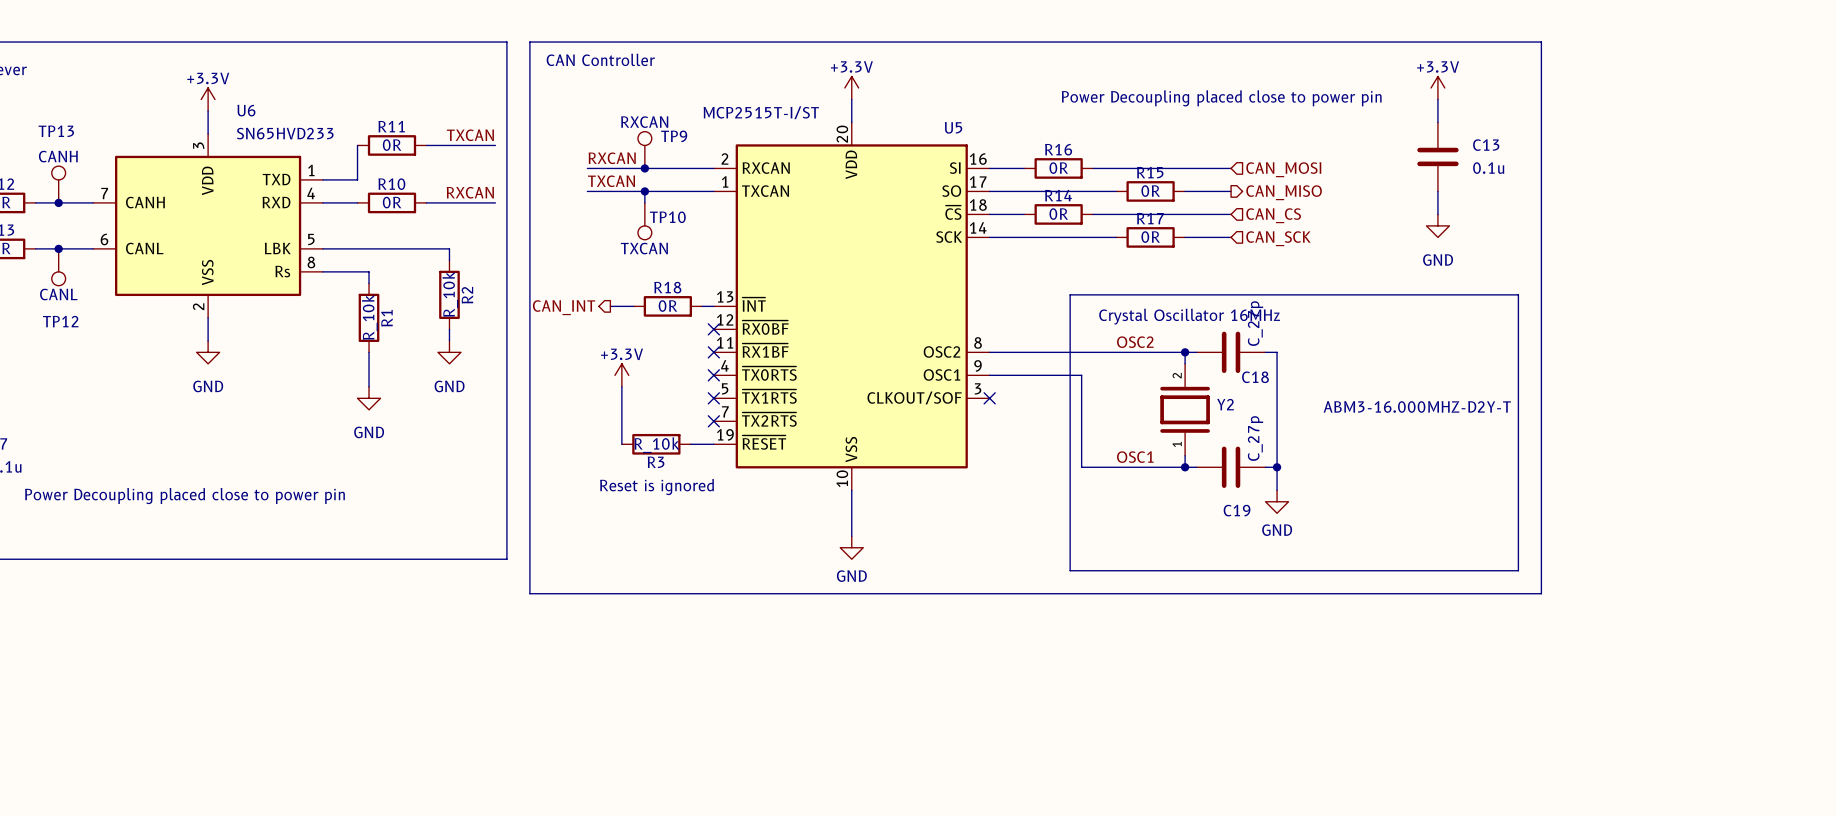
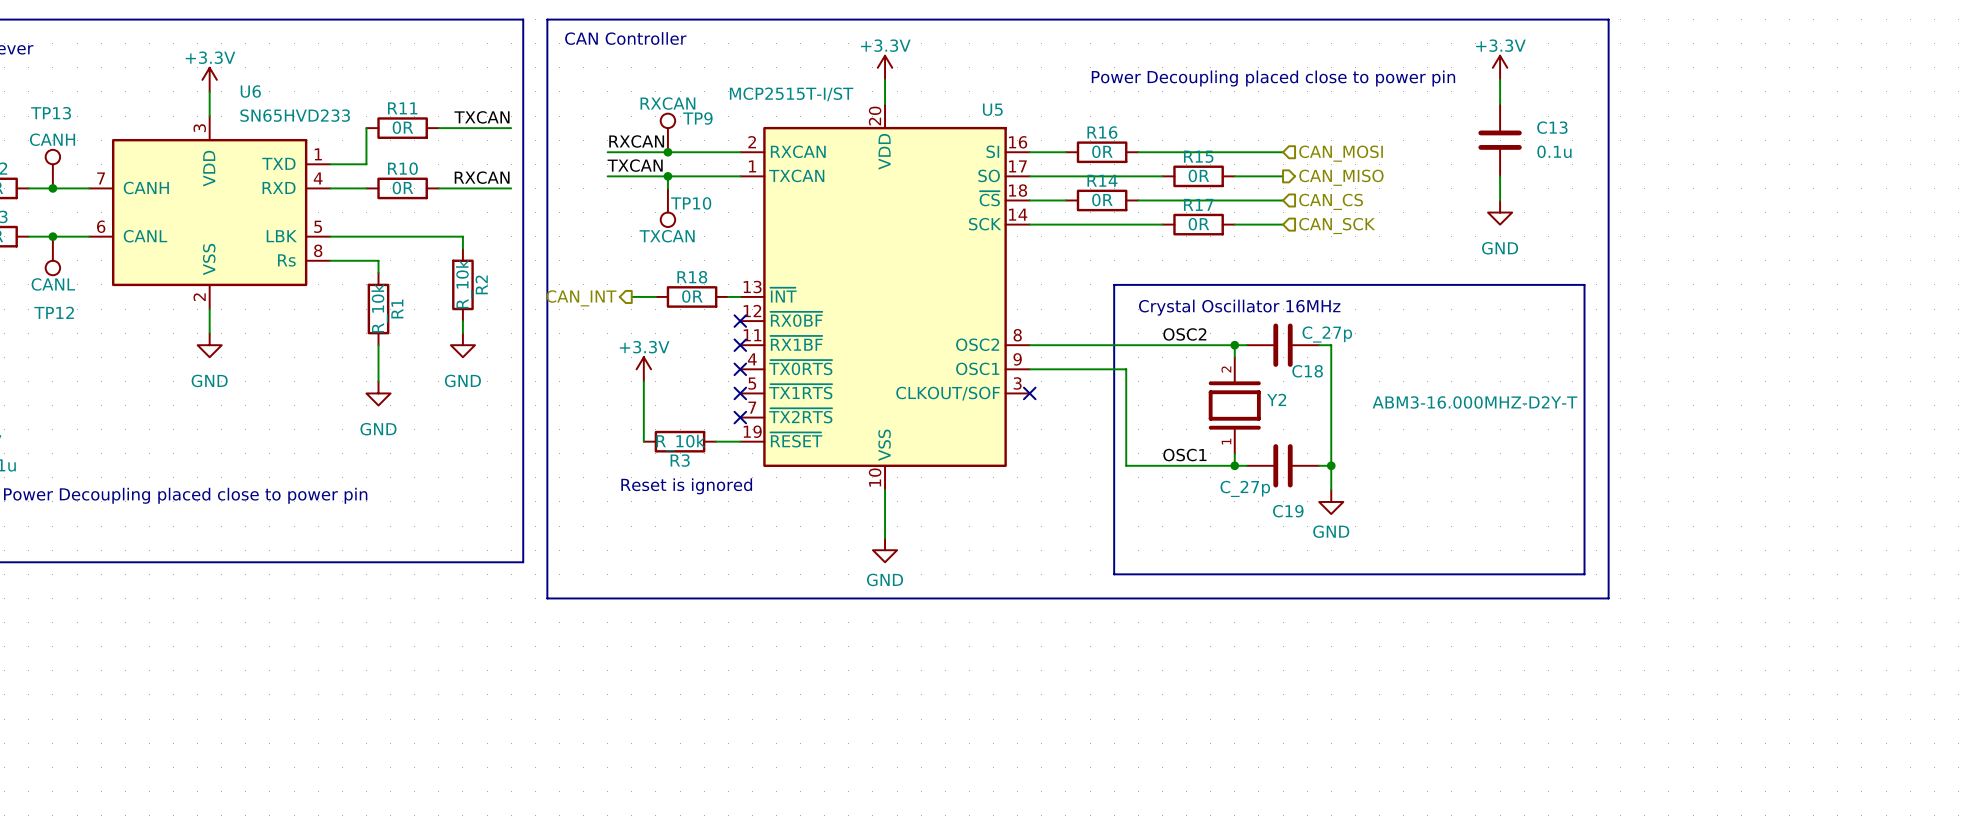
C18 value rotation: 0° (1255, 323) -> 90° clockwise (1327, 334)
C19 value rotation: 0° (1255, 438) -> 90° clockwise (1245, 488)
C19 value position: C_27p (1255, 438) -> C_27p (1245, 488)

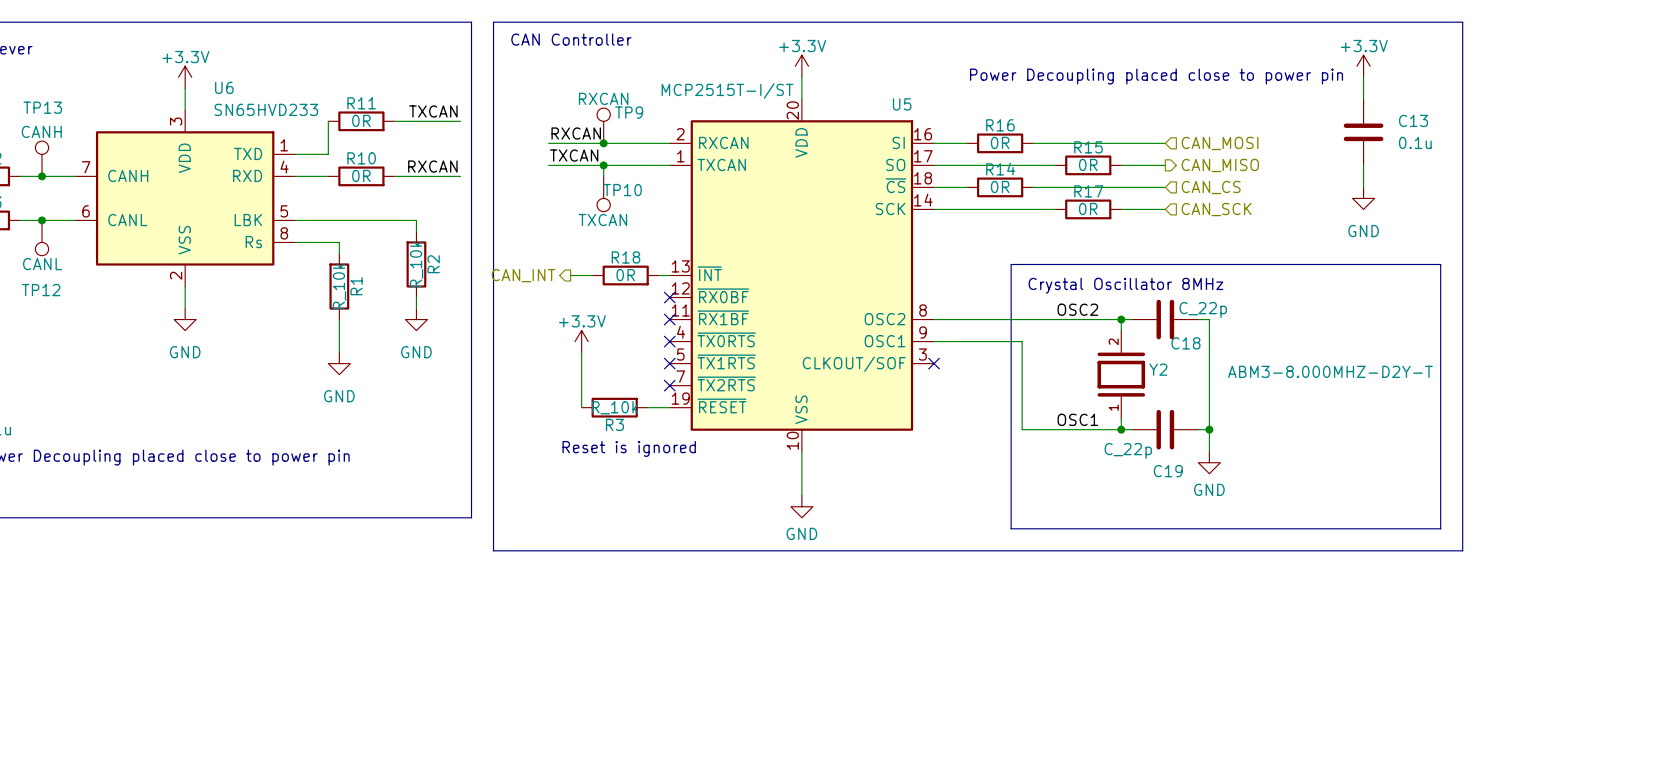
text: Crystal Oscillator 16MHz (1239, 307) -> Crystal Oscillator 8MHz (1125, 285)
C18 value: C_27p (1327, 334) -> C_22p (1203, 309)
Y2 value: ABM3-16.000MHZ-D2Y-T (1474, 402) -> ABM3-8.000MHZ-D2Y-T (1330, 371)
C19 value: C_27p (1245, 488) -> C_22p (1128, 450)

